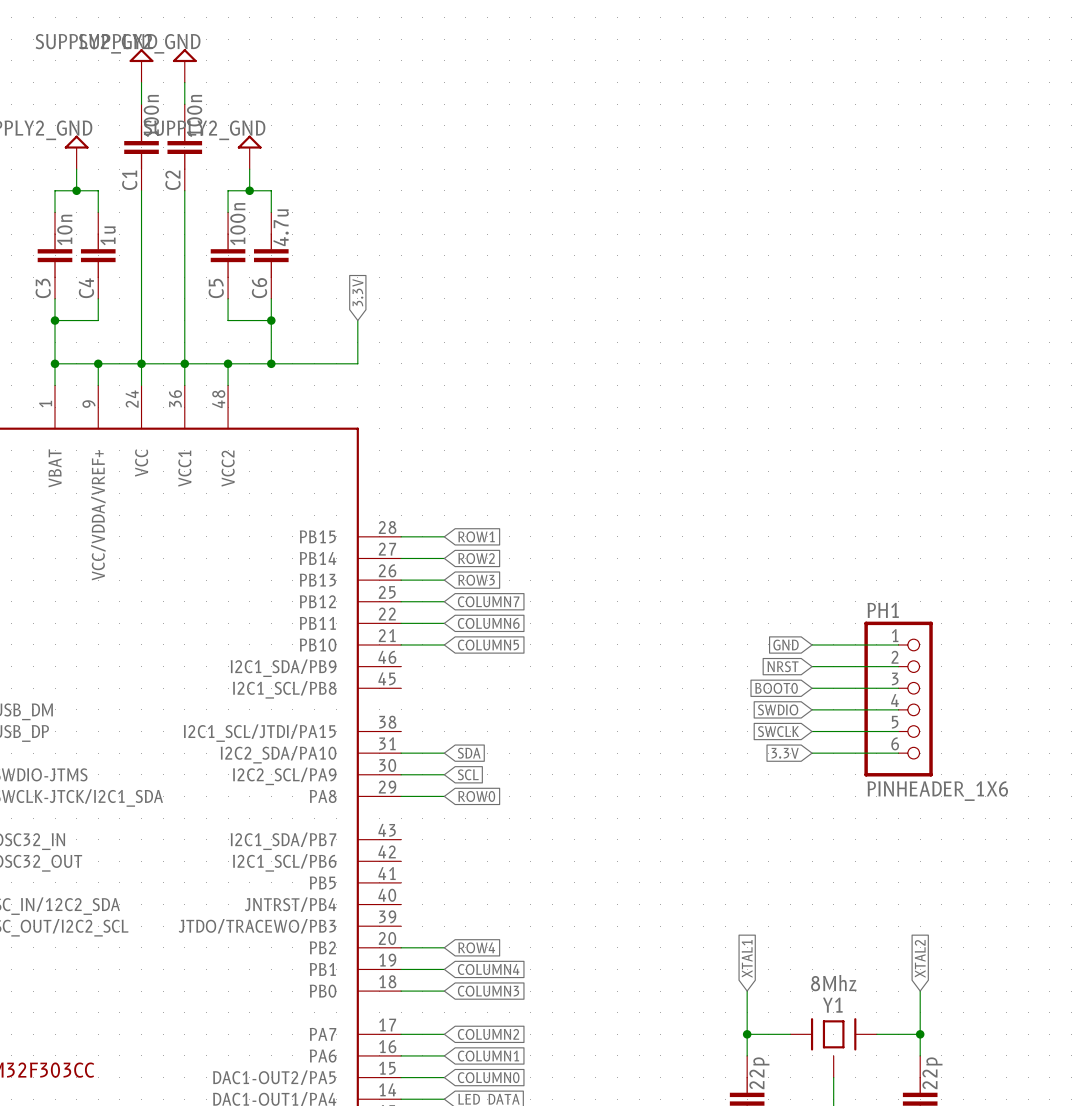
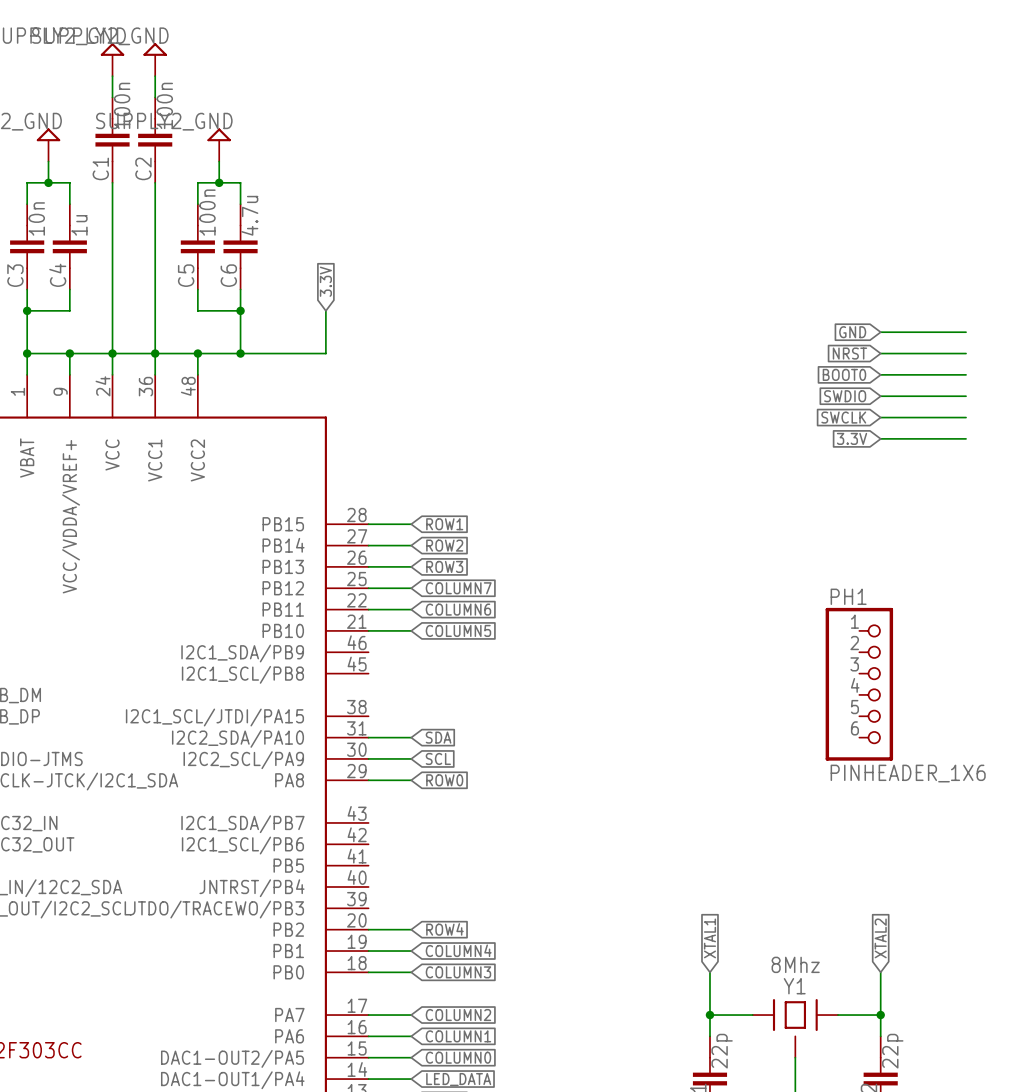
global label: none -> GND (852, 332)
wire: none -> (880, 332) (966, 332)
global label: none -> NRST (849, 353)
wire: none -> (880, 353) (966, 353)
global label: none -> BOOT0 (844, 374)
wire: none -> (880, 374) (966, 374)
global label: none -> SWDIO (845, 396)
wire: none -> (880, 396) (966, 396)
global label: none -> SWCLK (843, 417)
wire: none -> (880, 417) (966, 417)
global label: none -> 3.3V (852, 438)
wire: none -> (880, 438) (966, 438)
wire: (812, 644) (898, 644) -> none
global label: GND (786, 645) -> none
global label: NRST (783, 666) -> none
wire: (812, 666) (898, 666) -> none
global label: BOOT0 (776, 688) -> none
wire: (812, 688) (898, 688) -> none
global label: SWDIO (778, 709) -> none
wire: (812, 709) (898, 709) -> none
global label: SWCLK (778, 731) -> none
wire: (812, 731) (898, 731) -> none
global label: 3.3V (785, 753) -> none
wire: (812, 753) (898, 753) -> none

